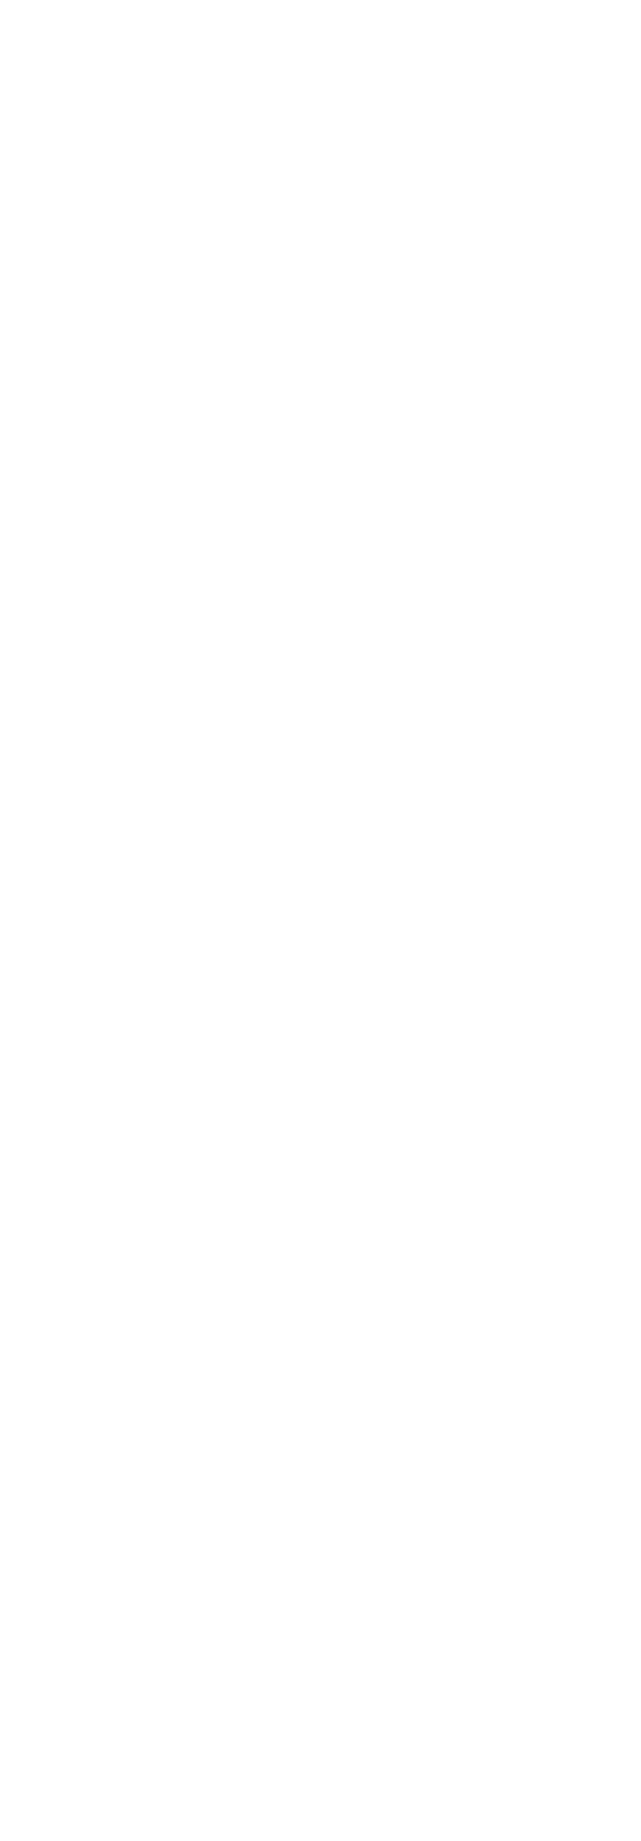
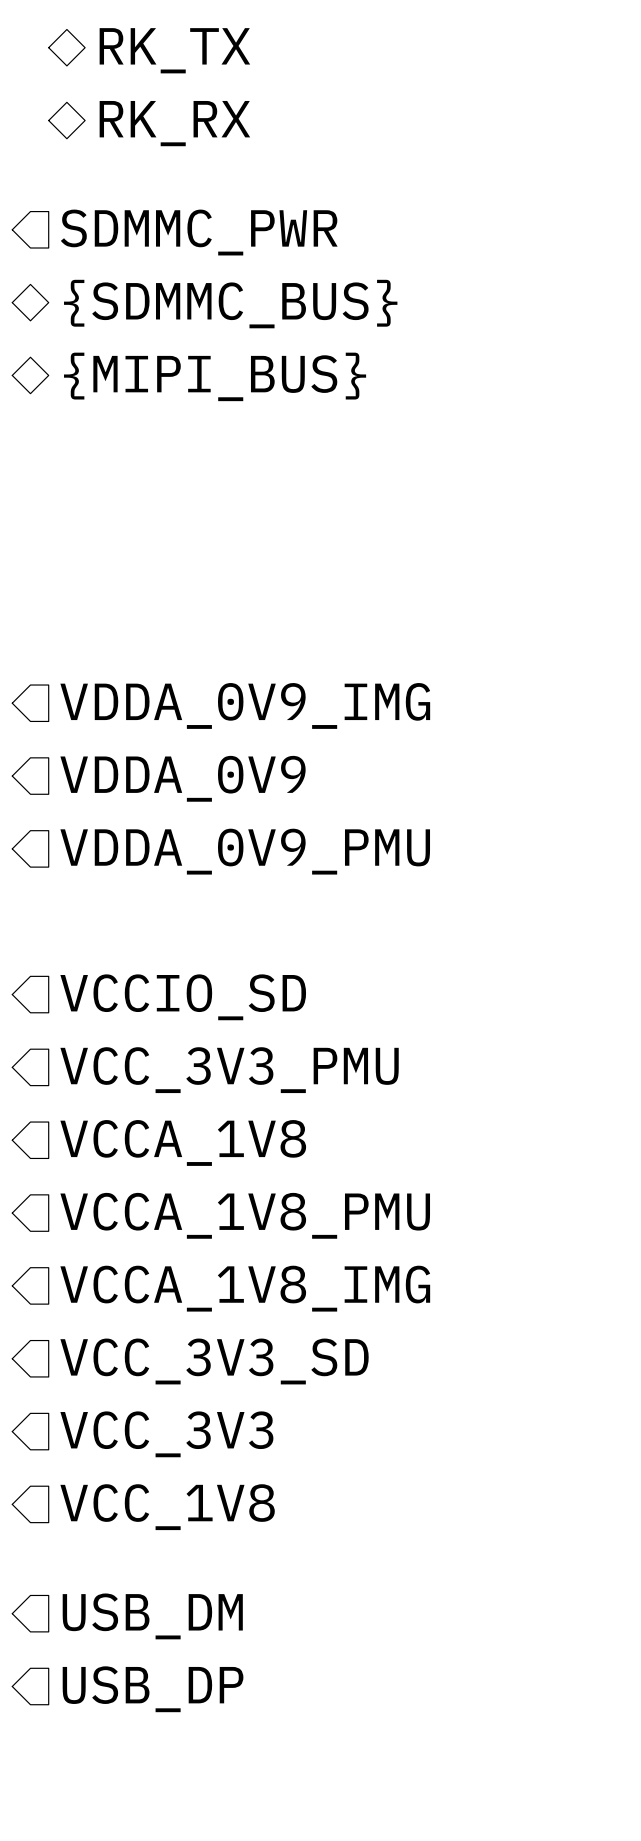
hierarchical label: none -> RK_TX (174, 50)
hierarchical label: none -> RK_RX (174, 123)
hierarchical label: none -> SDMMC_PWR (199, 232)
hierarchical label: none -> {SDMMC_BUS} (230, 304)
hierarchical label: none -> {MIPI_BUS} (215, 376)
hierarchical label: none -> VDDA_0V9_IMG (245, 705)
hierarchical label: none -> VDDA_0V9 (183, 778)
hierarchical label: none -> VDDA_0V9_PMU (245, 851)
hierarchical label: none -> VCCIO_SD (183, 997)
hierarchical label: none -> VCC_3V3_PMU (229, 1070)
hierarchical label: none -> VCCA_1V8 (183, 1142)
hierarchical label: none -> VCCA_1V8_PMU (245, 1215)
hierarchical label: none -> VCCA_1V8_IMG (245, 1288)
hierarchical label: none -> VCC_3V3_SD (214, 1361)
hierarchical label: none -> VCC_3V3 (166, 1434)
hierarchical label: none -> VCC_1V8 (167, 1507)
hierarchical label: none -> USB_DM (152, 1616)
hierarchical label: none -> USB_DP (153, 1689)

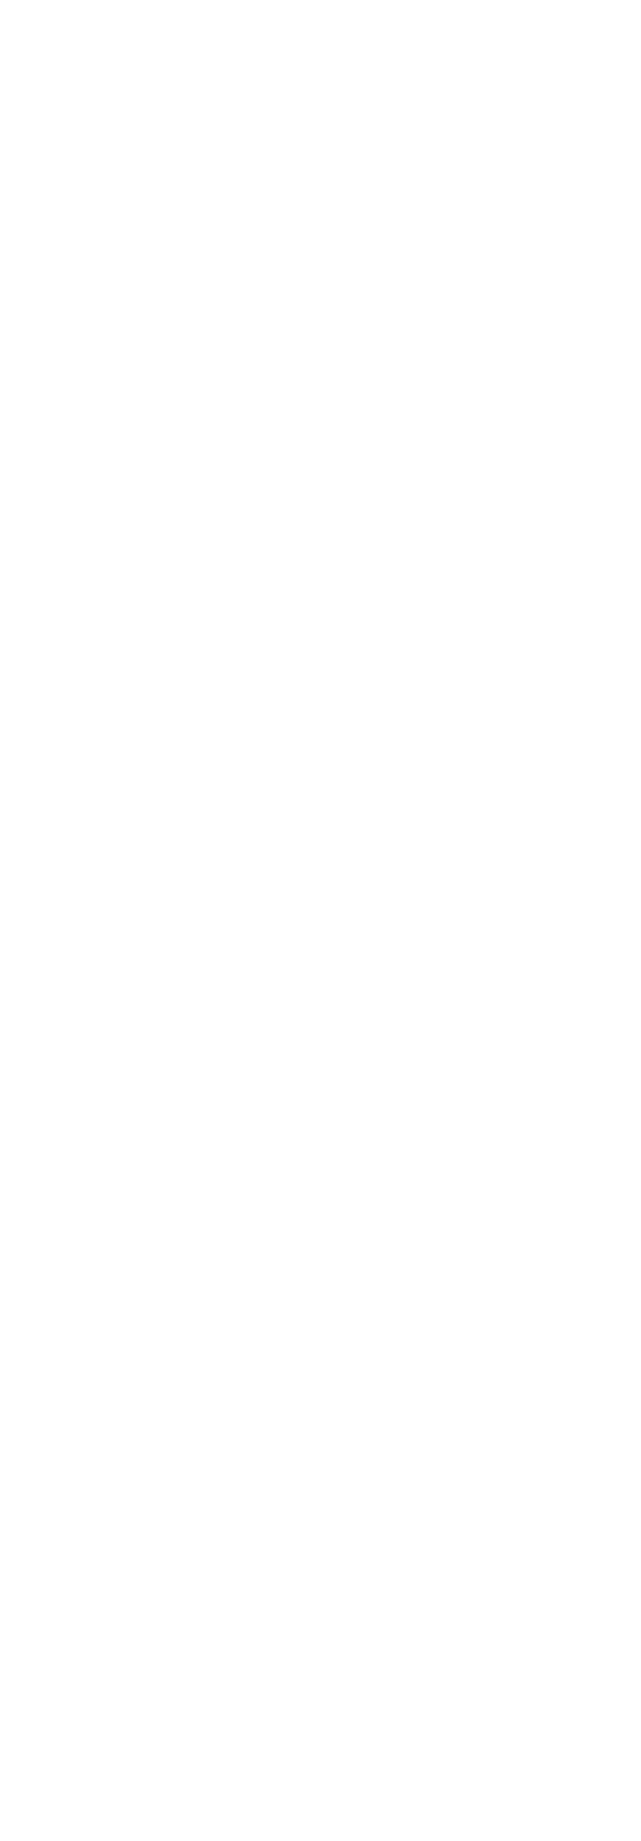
hierarchical label: RK_TX (174, 50) -> none
hierarchical label: RK_RX (174, 123) -> none
hierarchical label: SDMMC_PWR (199, 232) -> none
hierarchical label: {SDMMC_BUS} (230, 304) -> none
hierarchical label: {MIPI_BUS} (215, 376) -> none
hierarchical label: VDDA_0V9_IMG (245, 705) -> none
hierarchical label: VDDA_0V9 (183, 778) -> none
hierarchical label: VDDA_0V9_PMU (245, 851) -> none
hierarchical label: VCCIO_SD (183, 997) -> none
hierarchical label: VCC_3V3_PMU (229, 1070) -> none
hierarchical label: VCCA_1V8 (183, 1142) -> none
hierarchical label: VCCA_1V8_PMU (245, 1215) -> none
hierarchical label: VCCA_1V8_IMG (245, 1288) -> none
hierarchical label: VCC_3V3_SD (214, 1361) -> none
hierarchical label: VCC_3V3 (166, 1434) -> none
hierarchical label: VCC_1V8 (167, 1507) -> none
hierarchical label: USB_DM (152, 1616) -> none
hierarchical label: USB_DP (153, 1689) -> none

